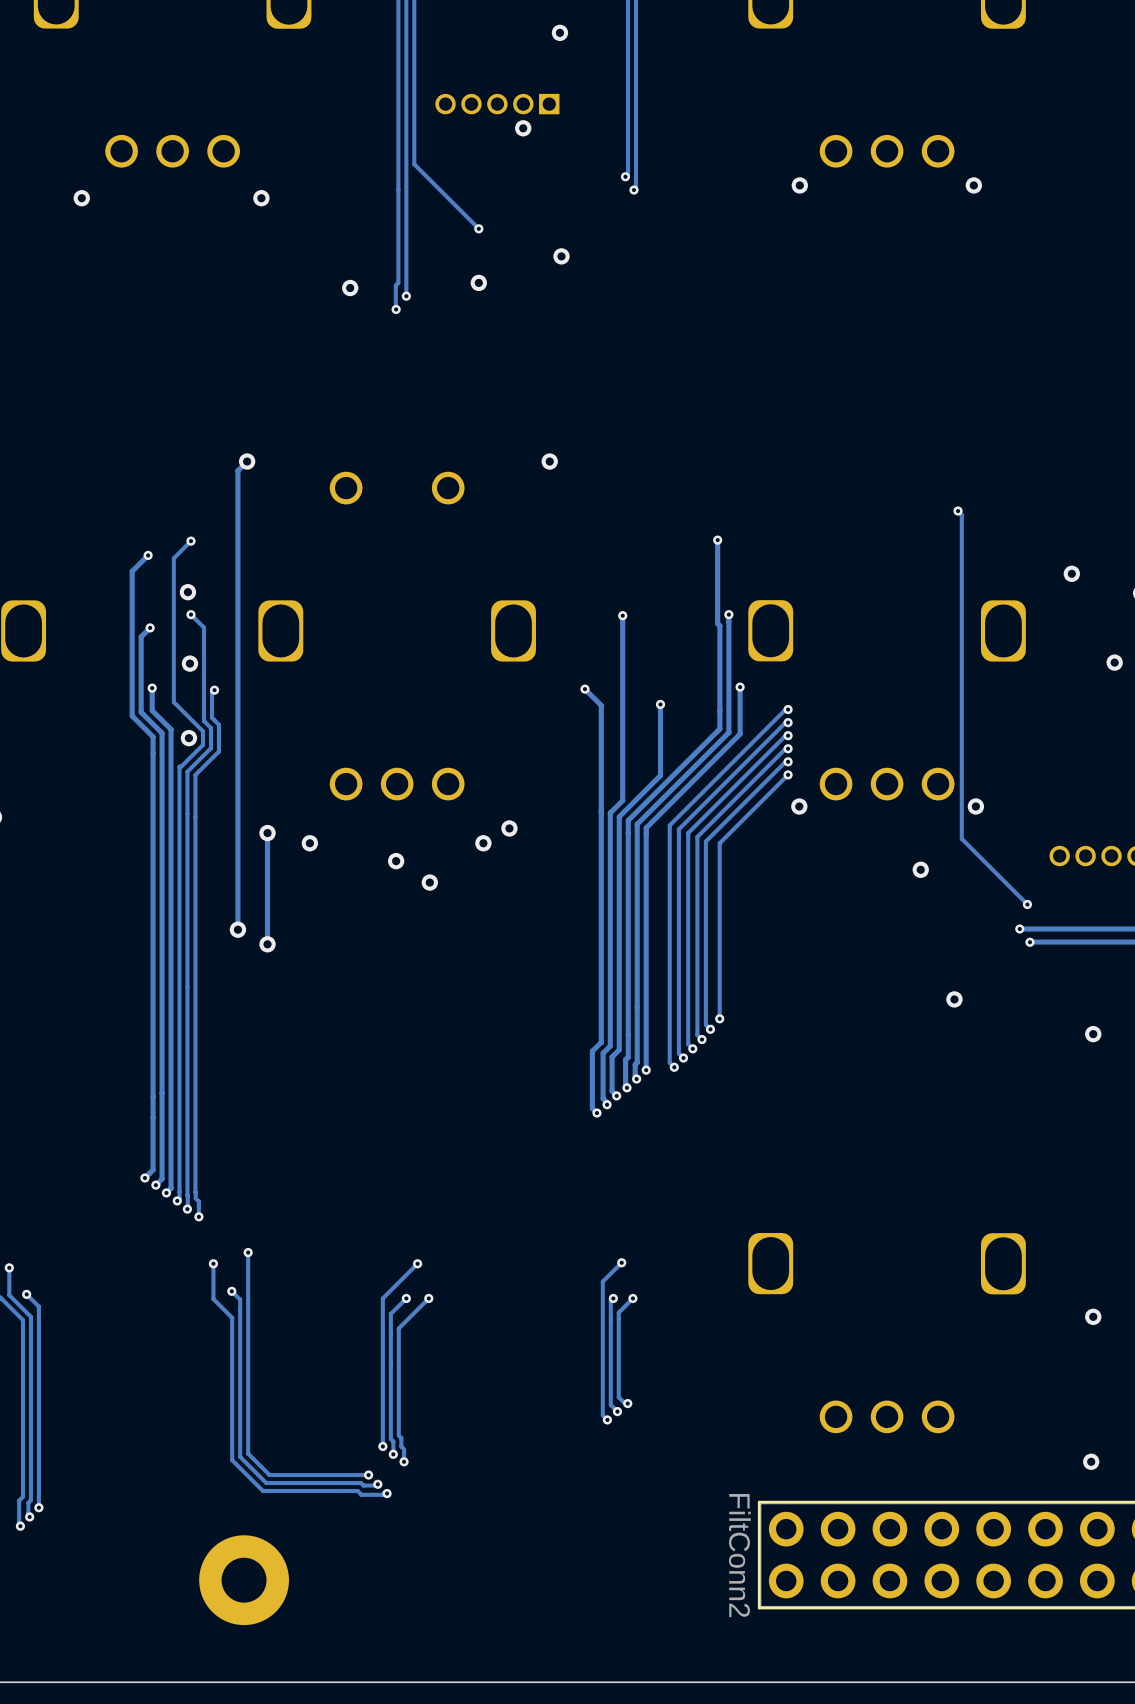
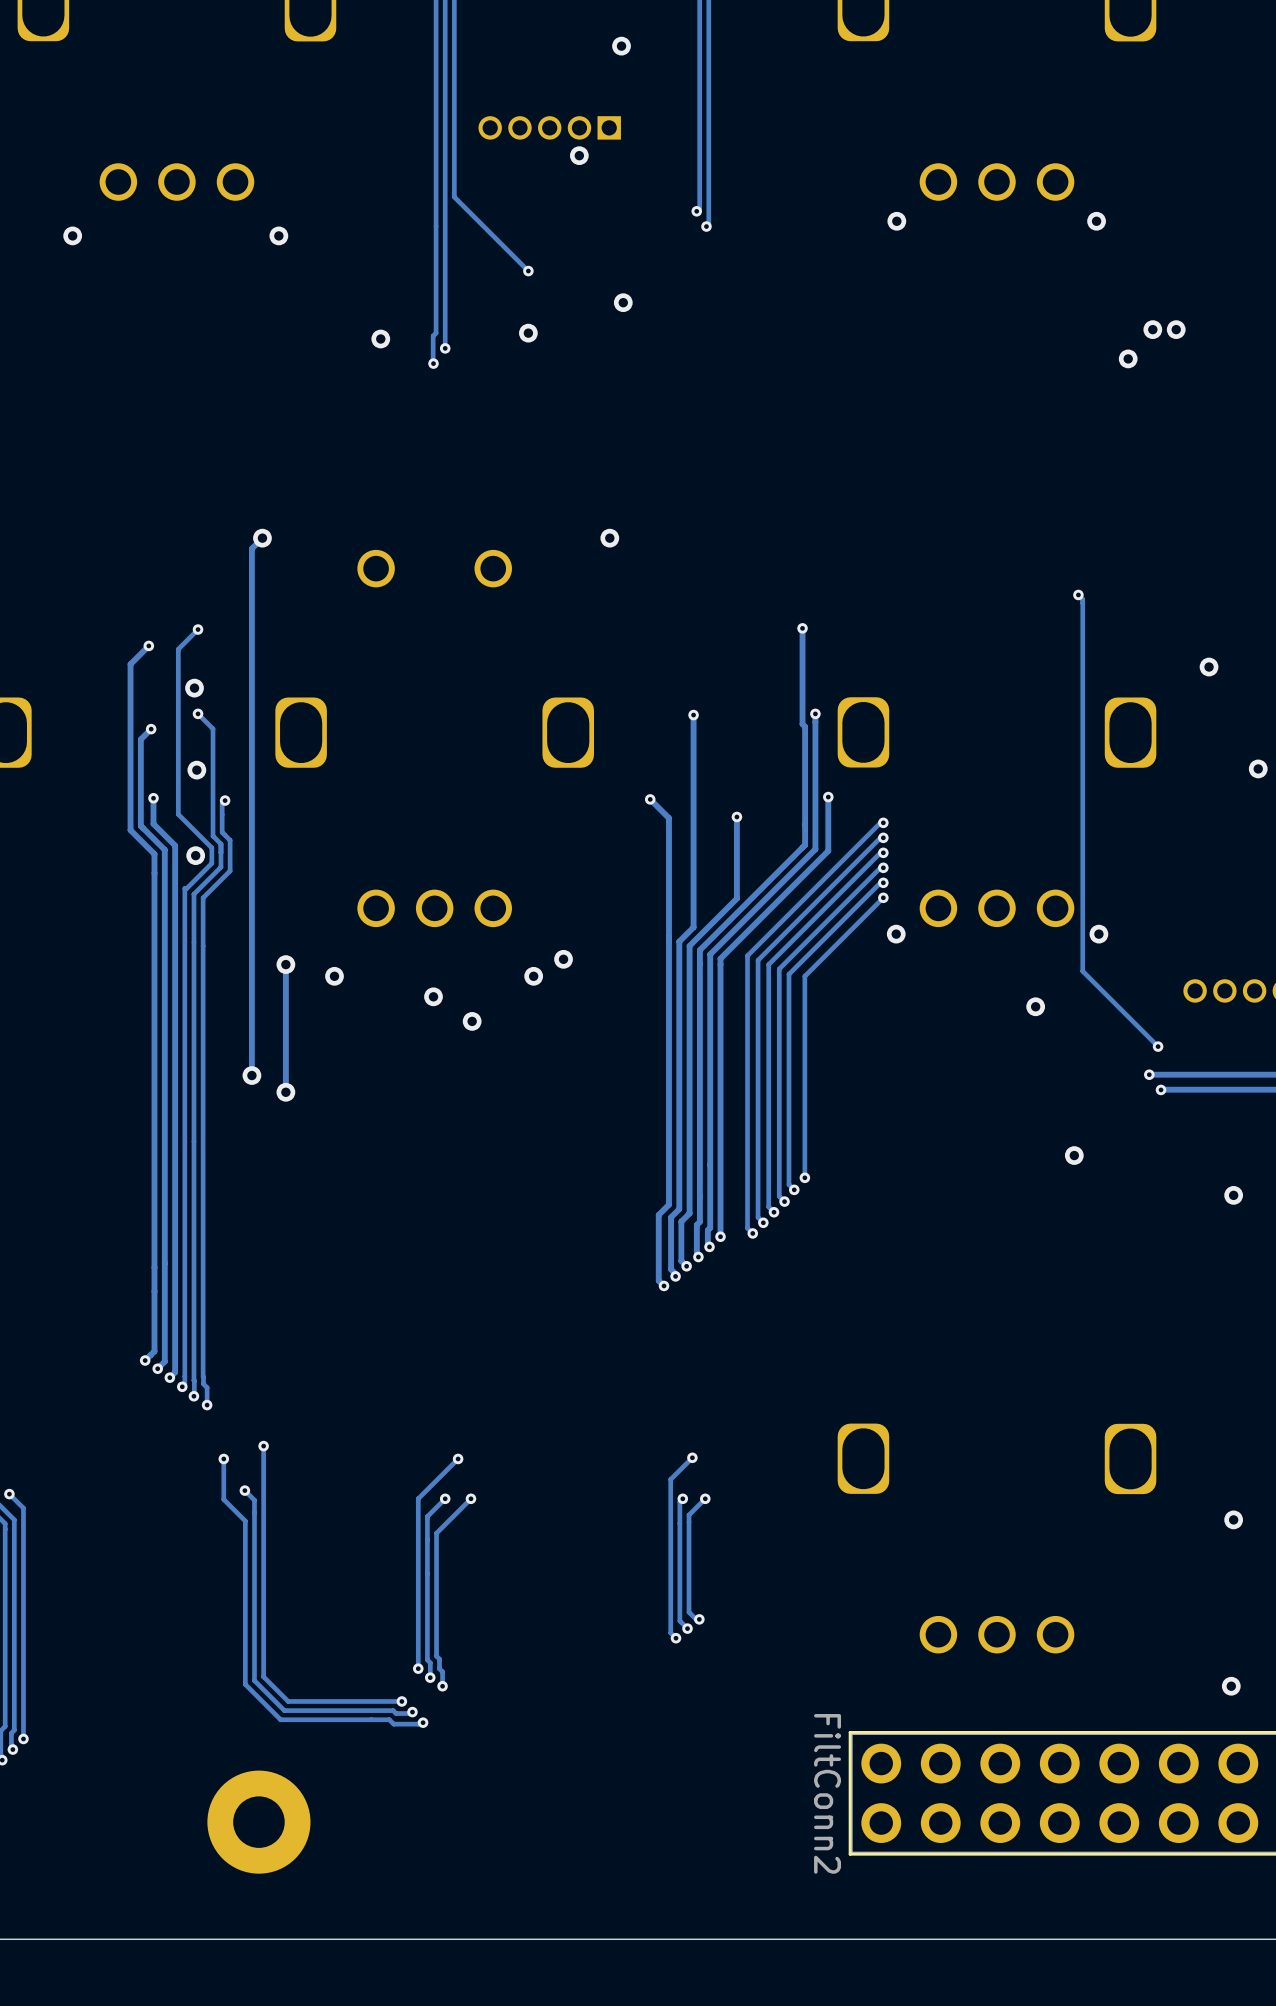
via: none -> (1152, 329)
via: none -> (1176, 329)
via: none -> (1128, 358)

